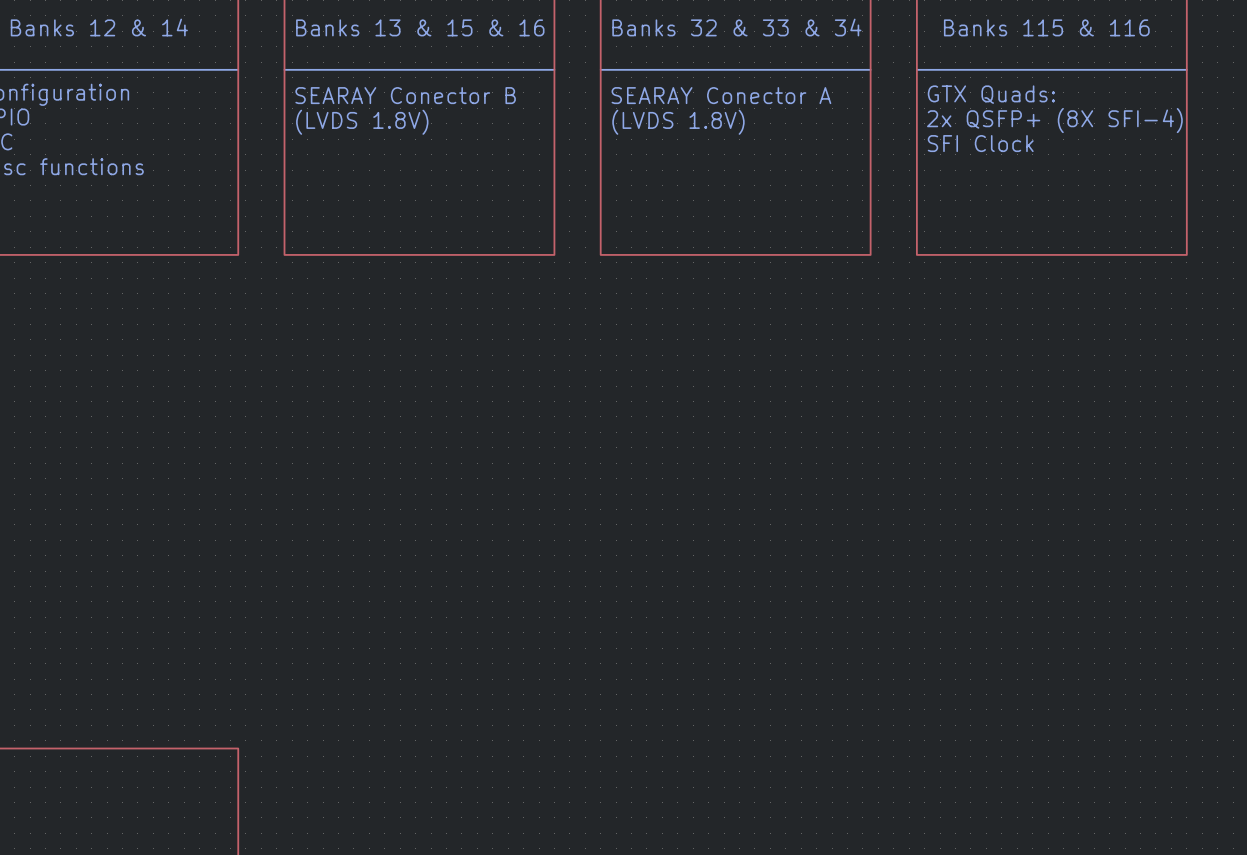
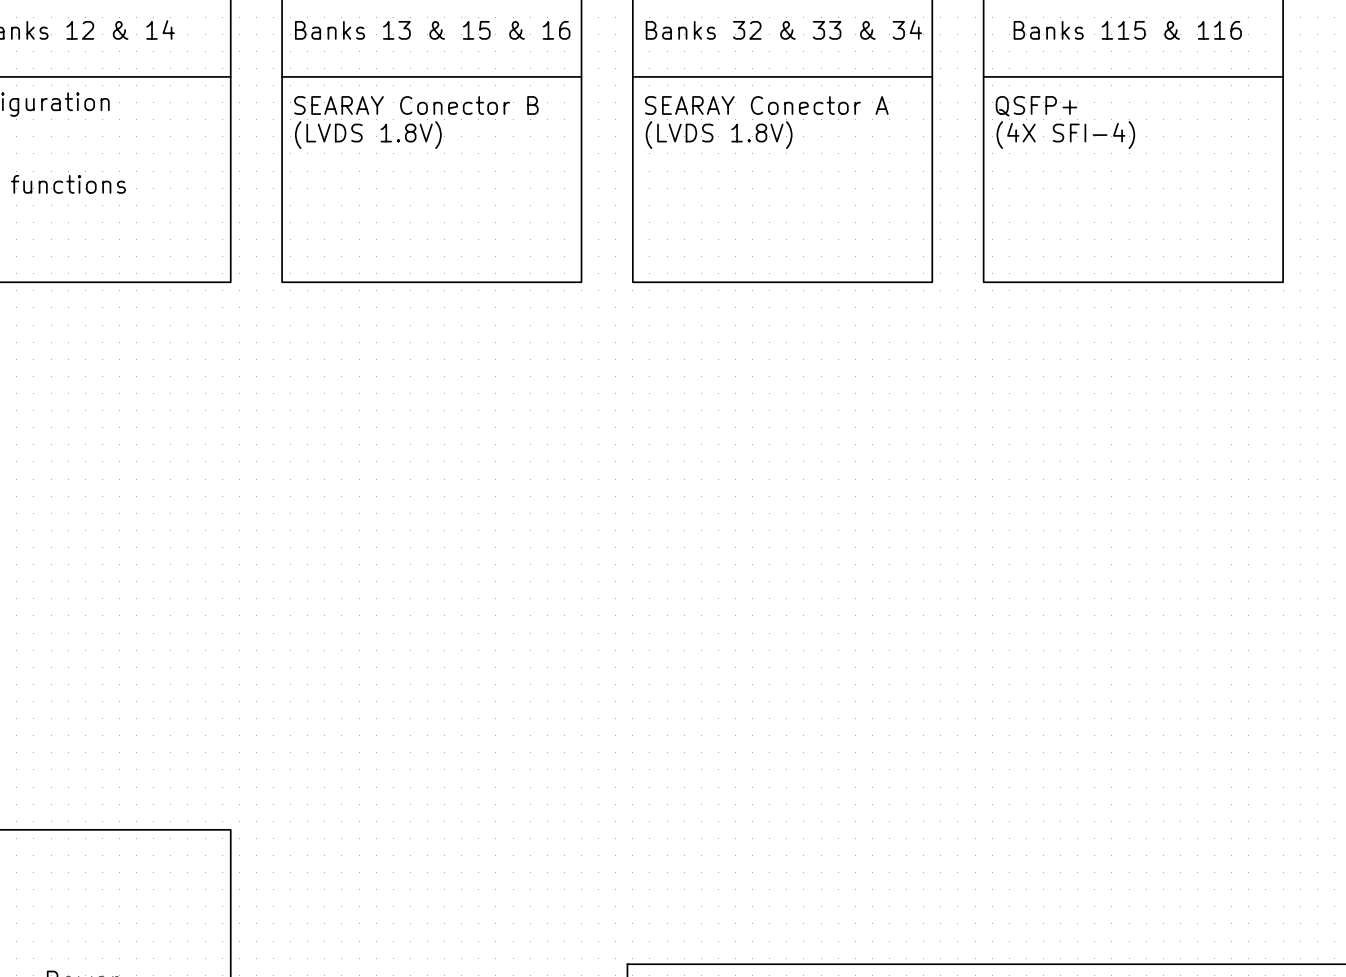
text: GTX Quads: (991, 94) -> QSFP+ (1036, 106)
text: 2x QSFP+ (8X SFI-4) (1054, 120) -> (4X SFI-4) (1065, 135)
text: SFI Clock (980, 143) -> none

